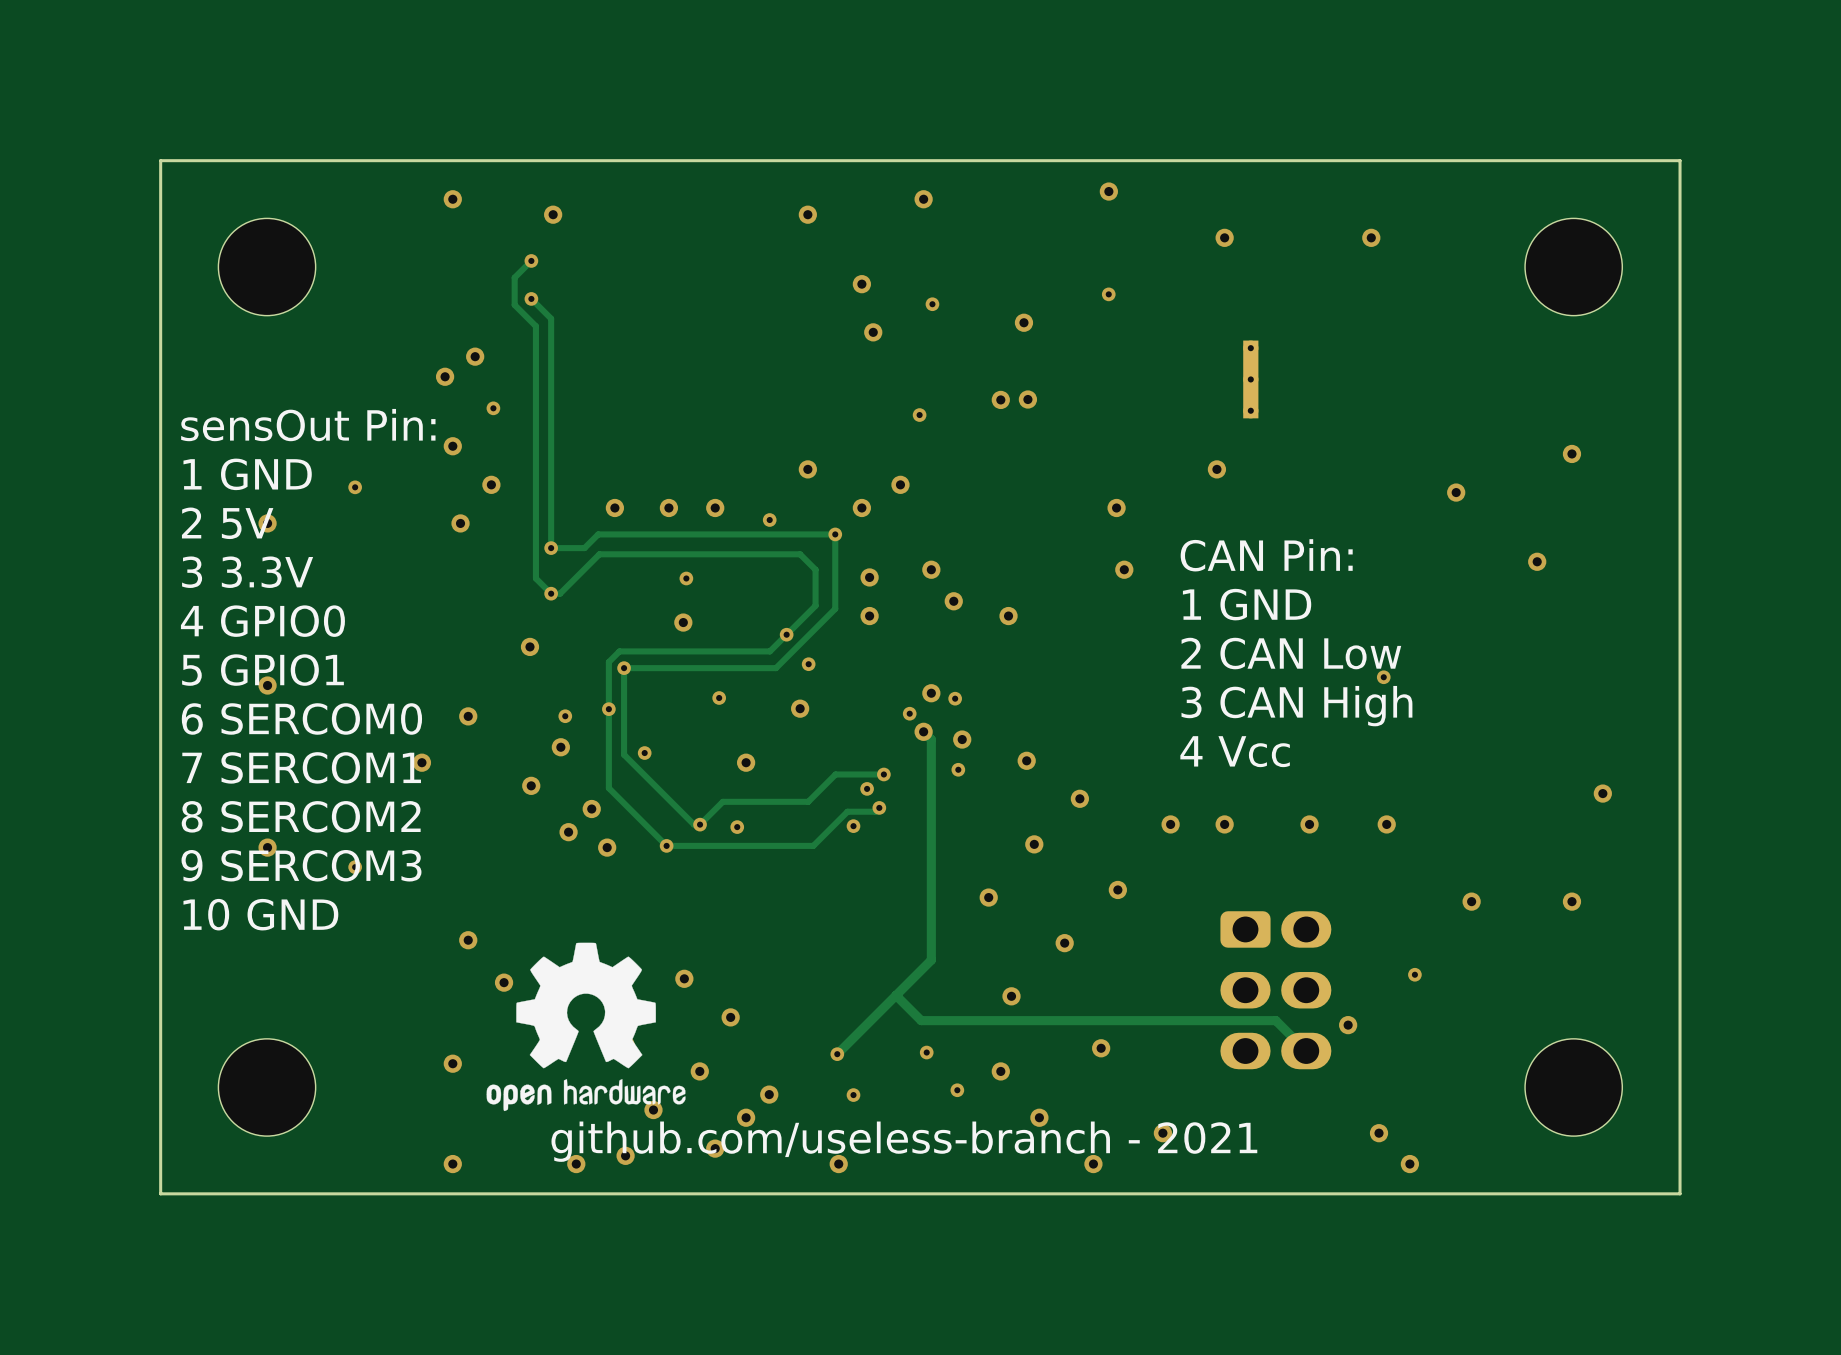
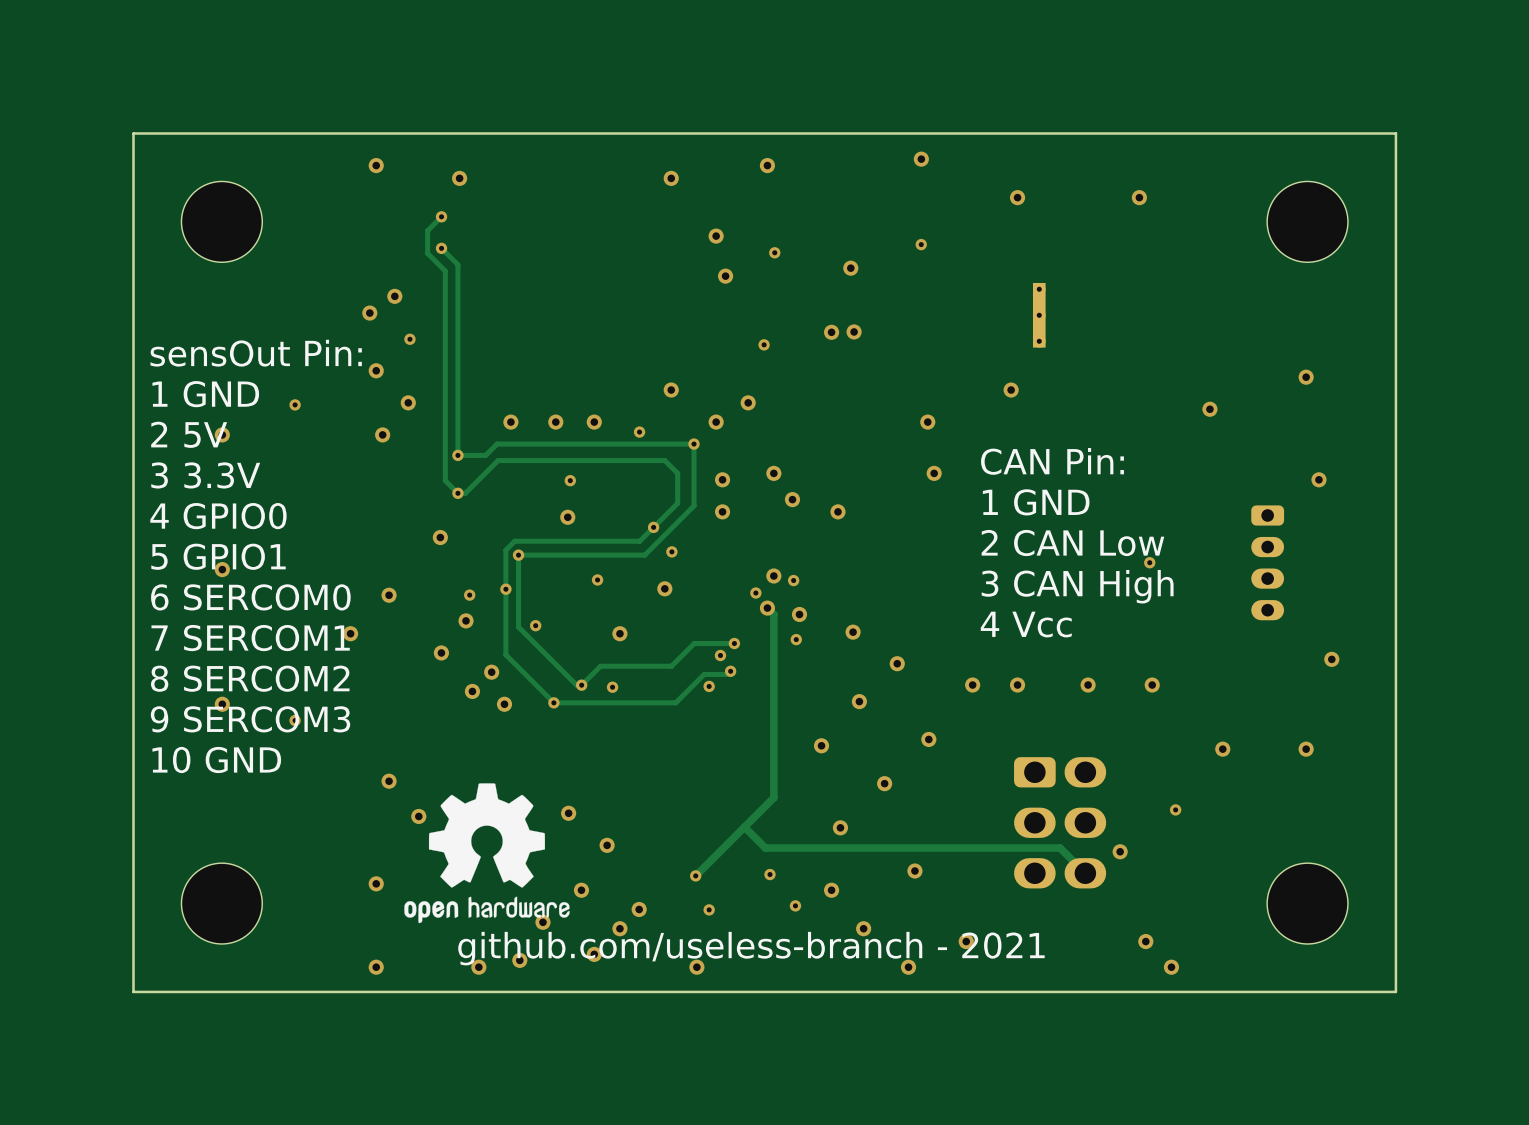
via position: (1537, 561) -> (1318, 479)
part: none -> (1267, 562)

